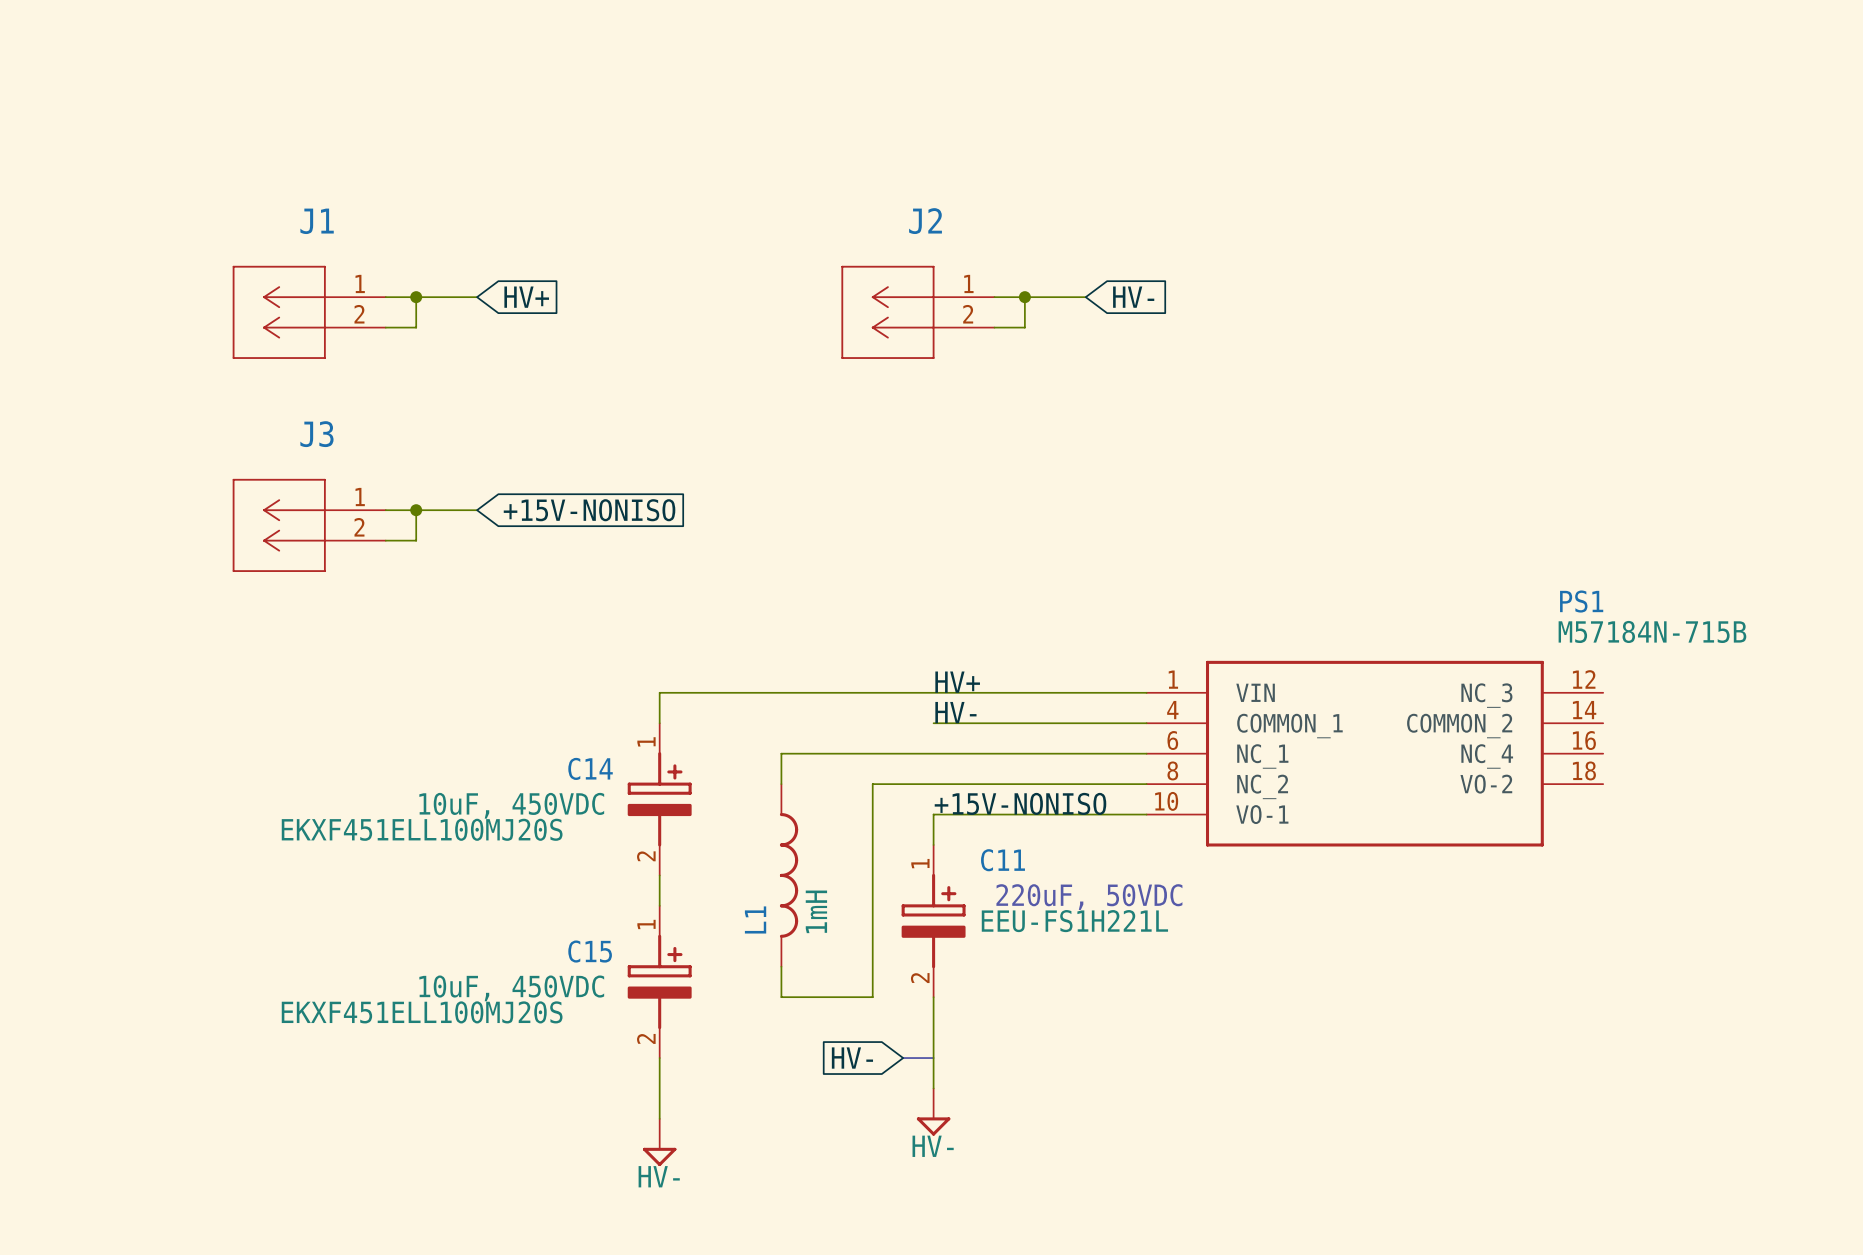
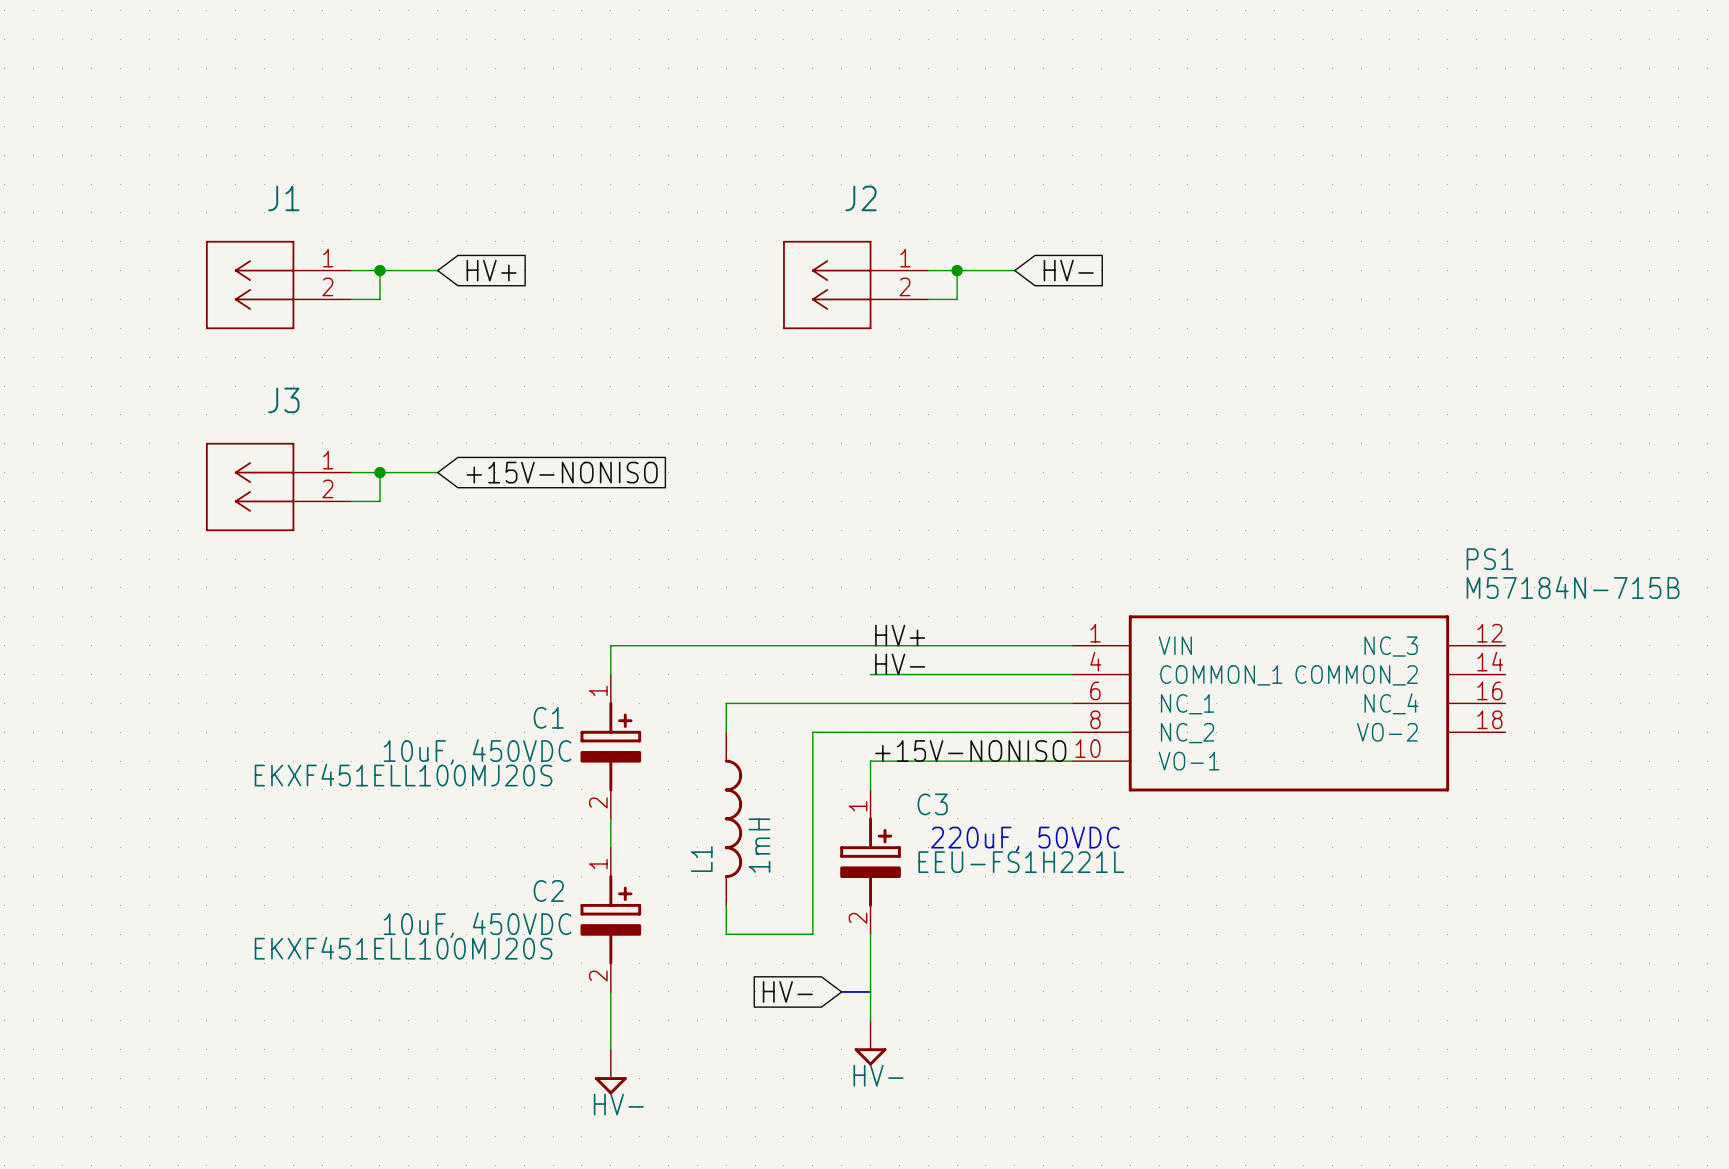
C14 name: C14 (590, 768) -> C1 (548, 717)
C11 name: C11 (1003, 860) -> C3 (932, 804)
C15 name: C15 (590, 951) -> C2 (548, 890)

